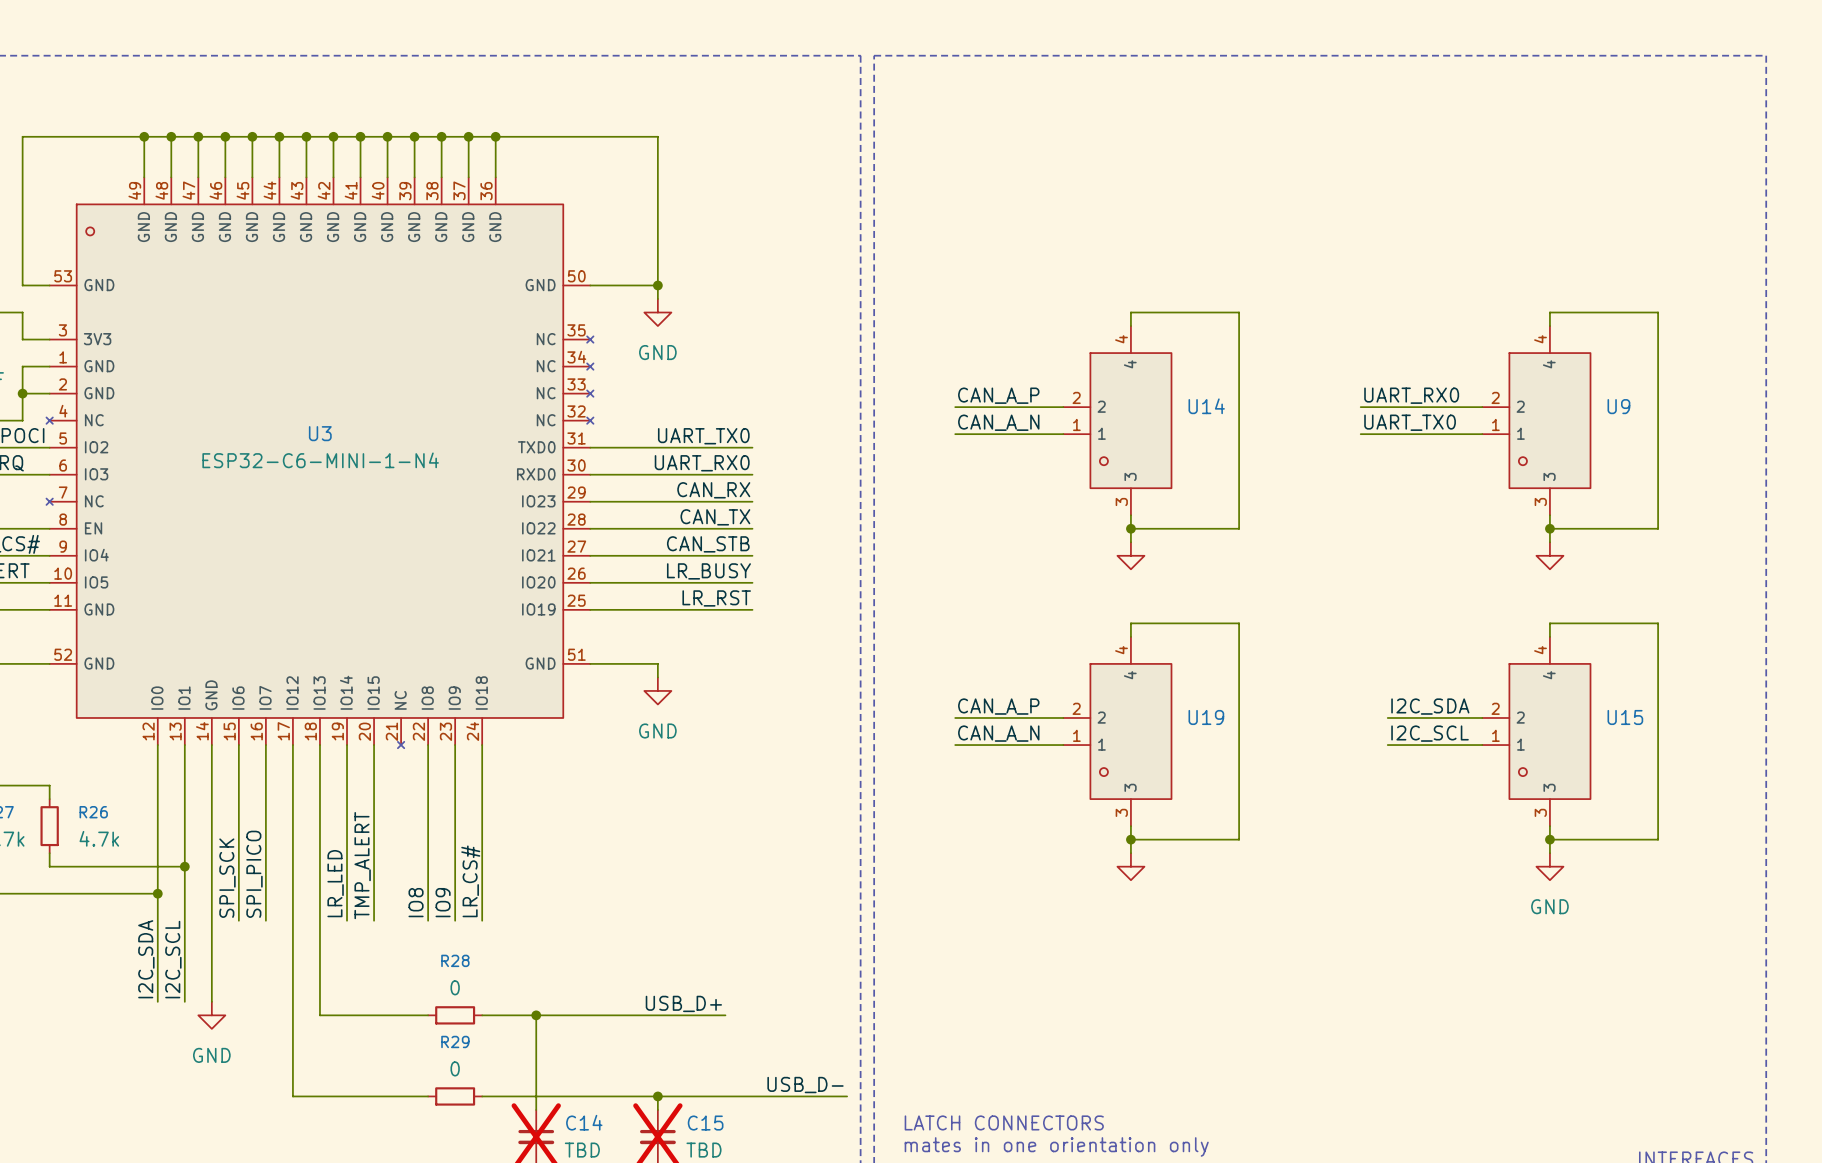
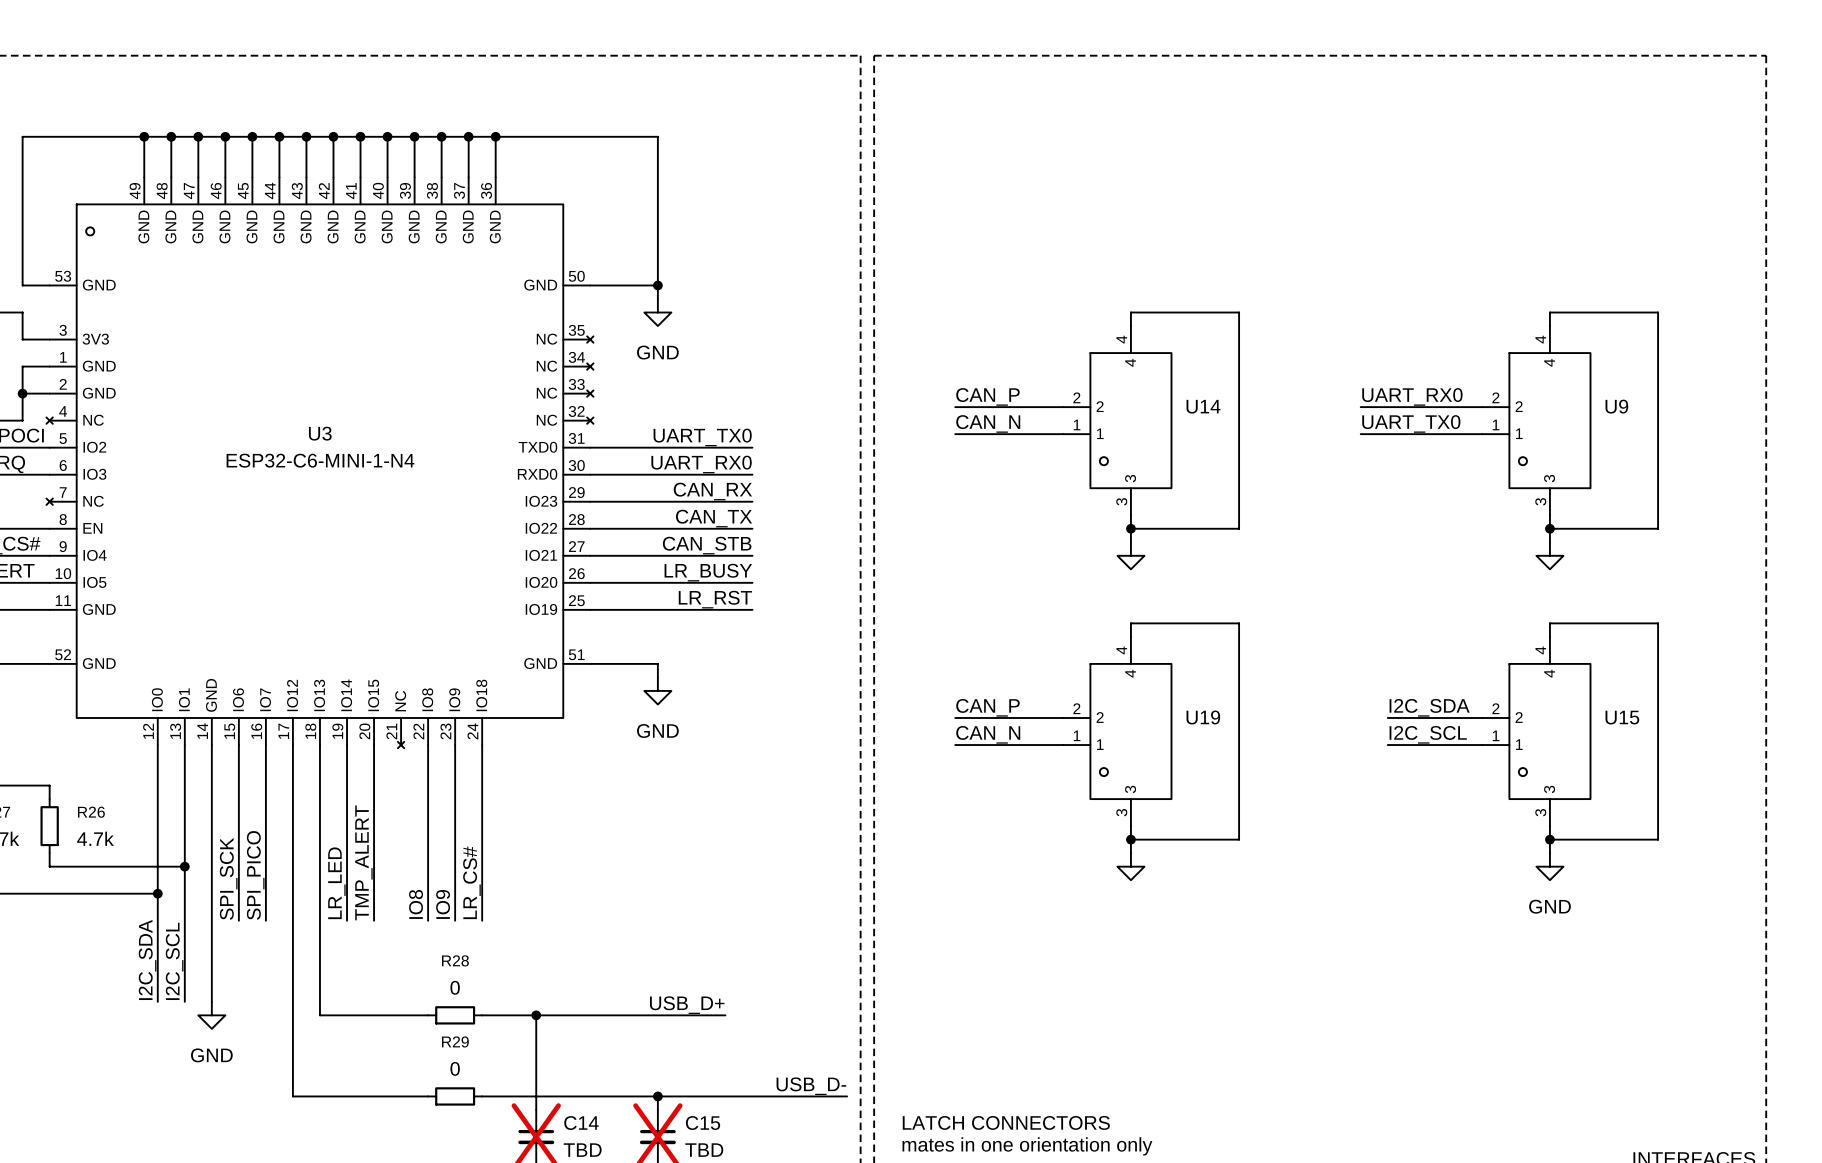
label: CAN_A_P (998, 395) -> CAN_P (987, 396)
label: CAN_A_N (998, 422) -> CAN_N (988, 423)
label: CAN_A_P (998, 706) -> CAN_P (987, 707)
label: CAN_A_N (998, 733) -> CAN_N (988, 734)

